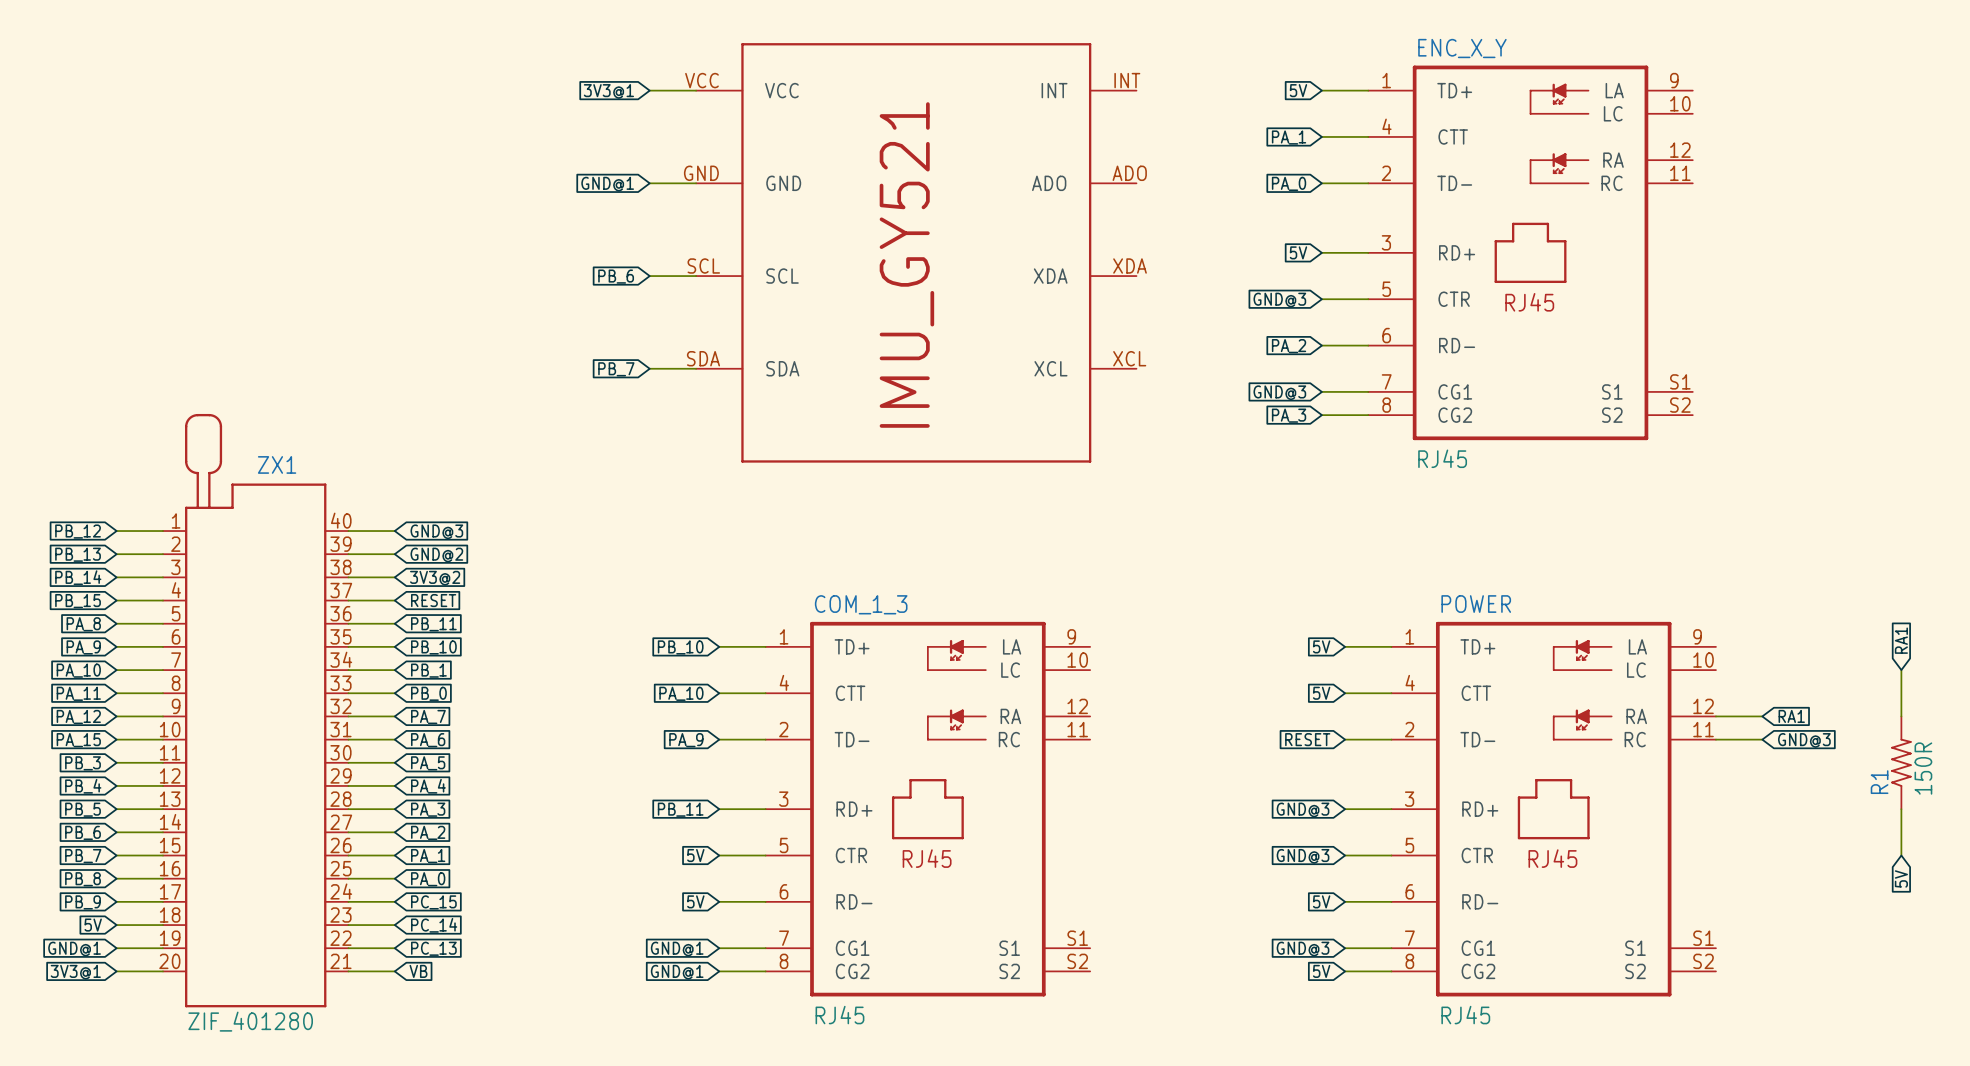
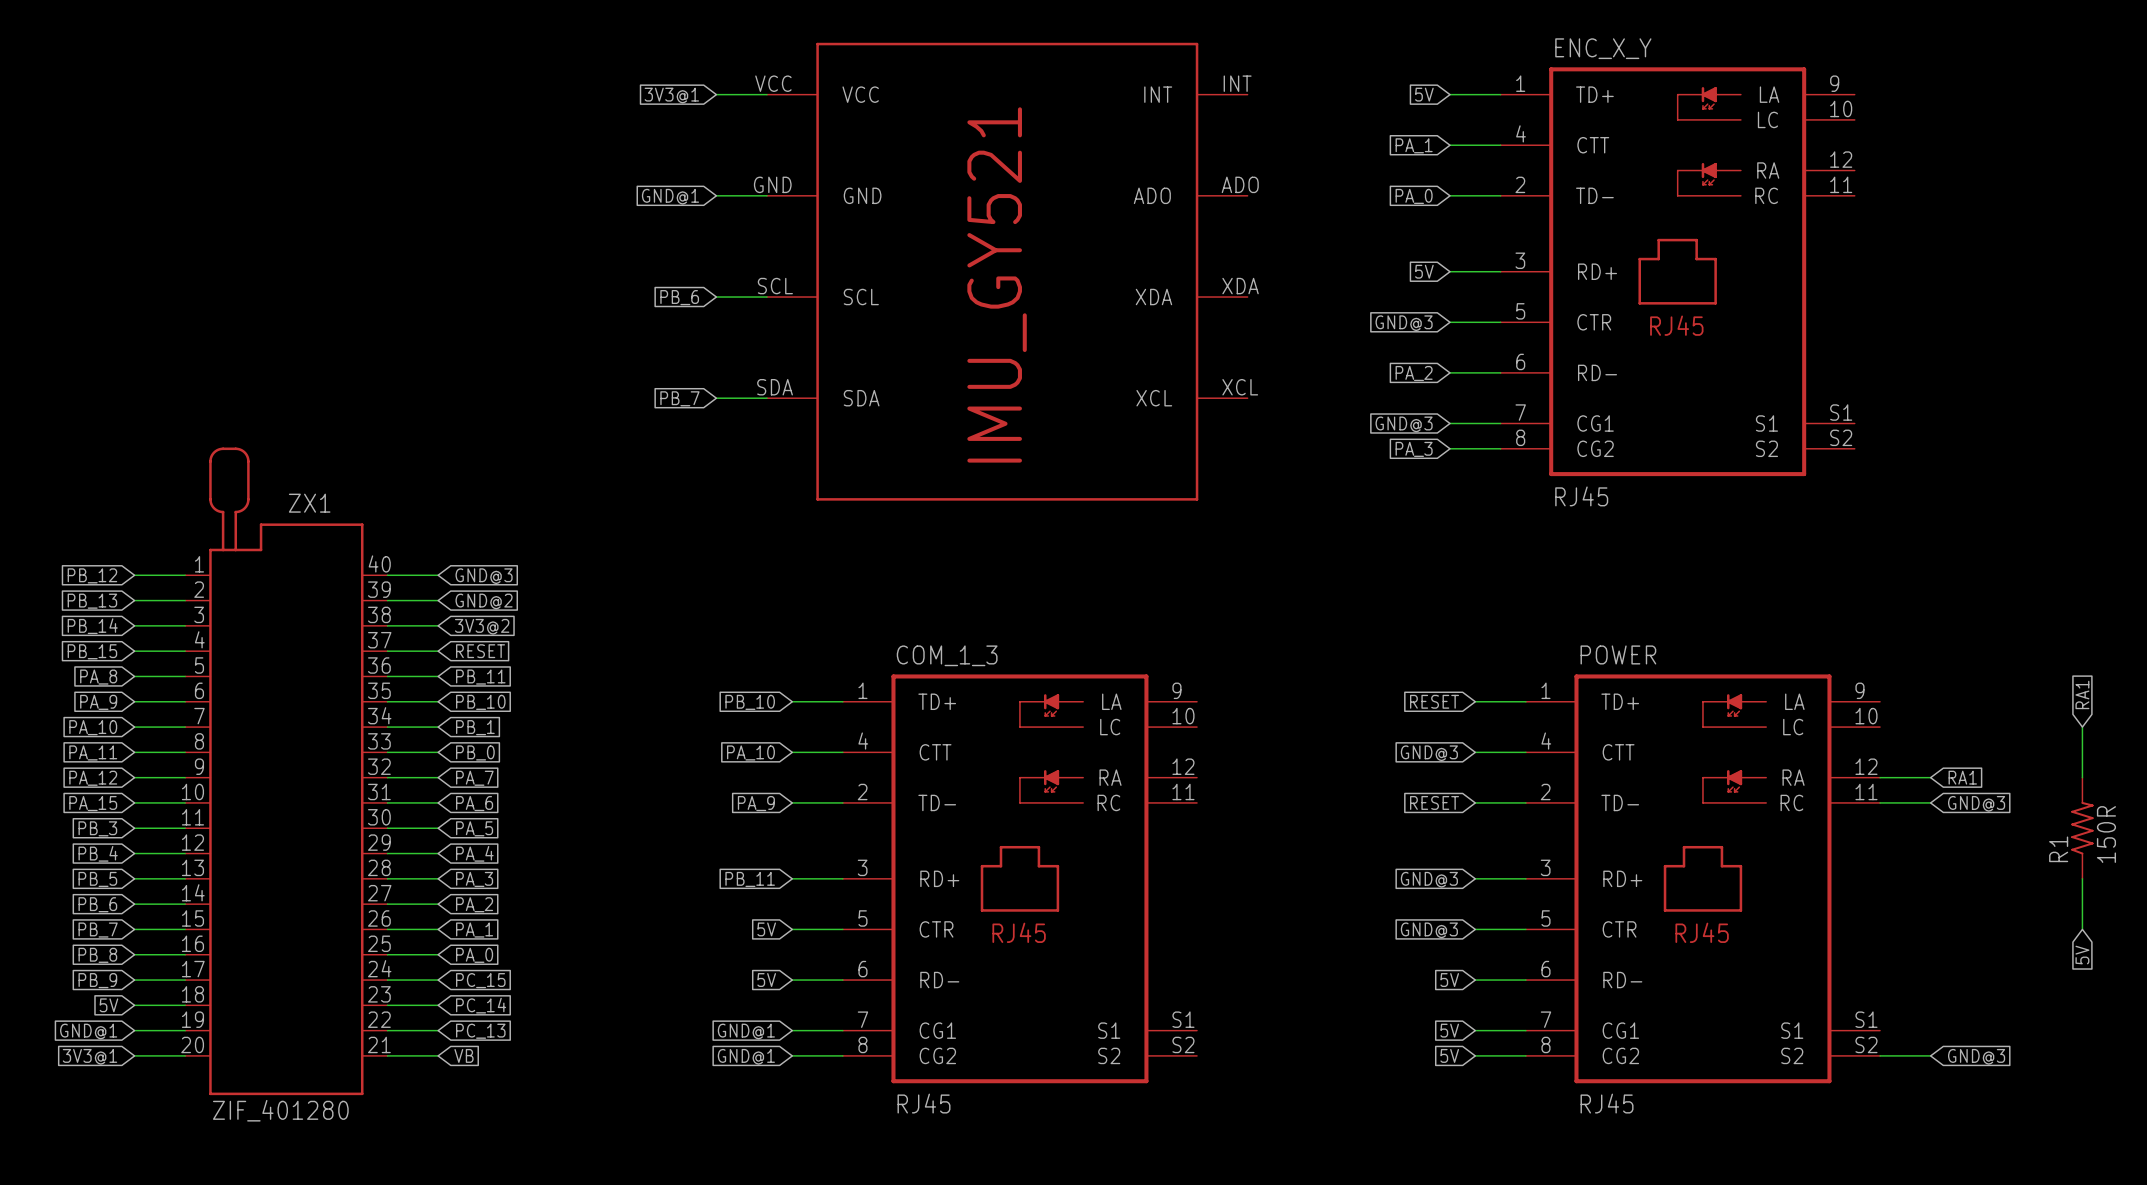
global label: 5V (1321, 646) -> RESET (1434, 701)
global label: 5V (1321, 693) -> GND@3 (1429, 753)
global label: GND@3 (1303, 949) -> 5V (1449, 1030)
wire: none -> (1880, 1055) (1930, 1055)
global label: none -> GND@3 (1976, 1056)

